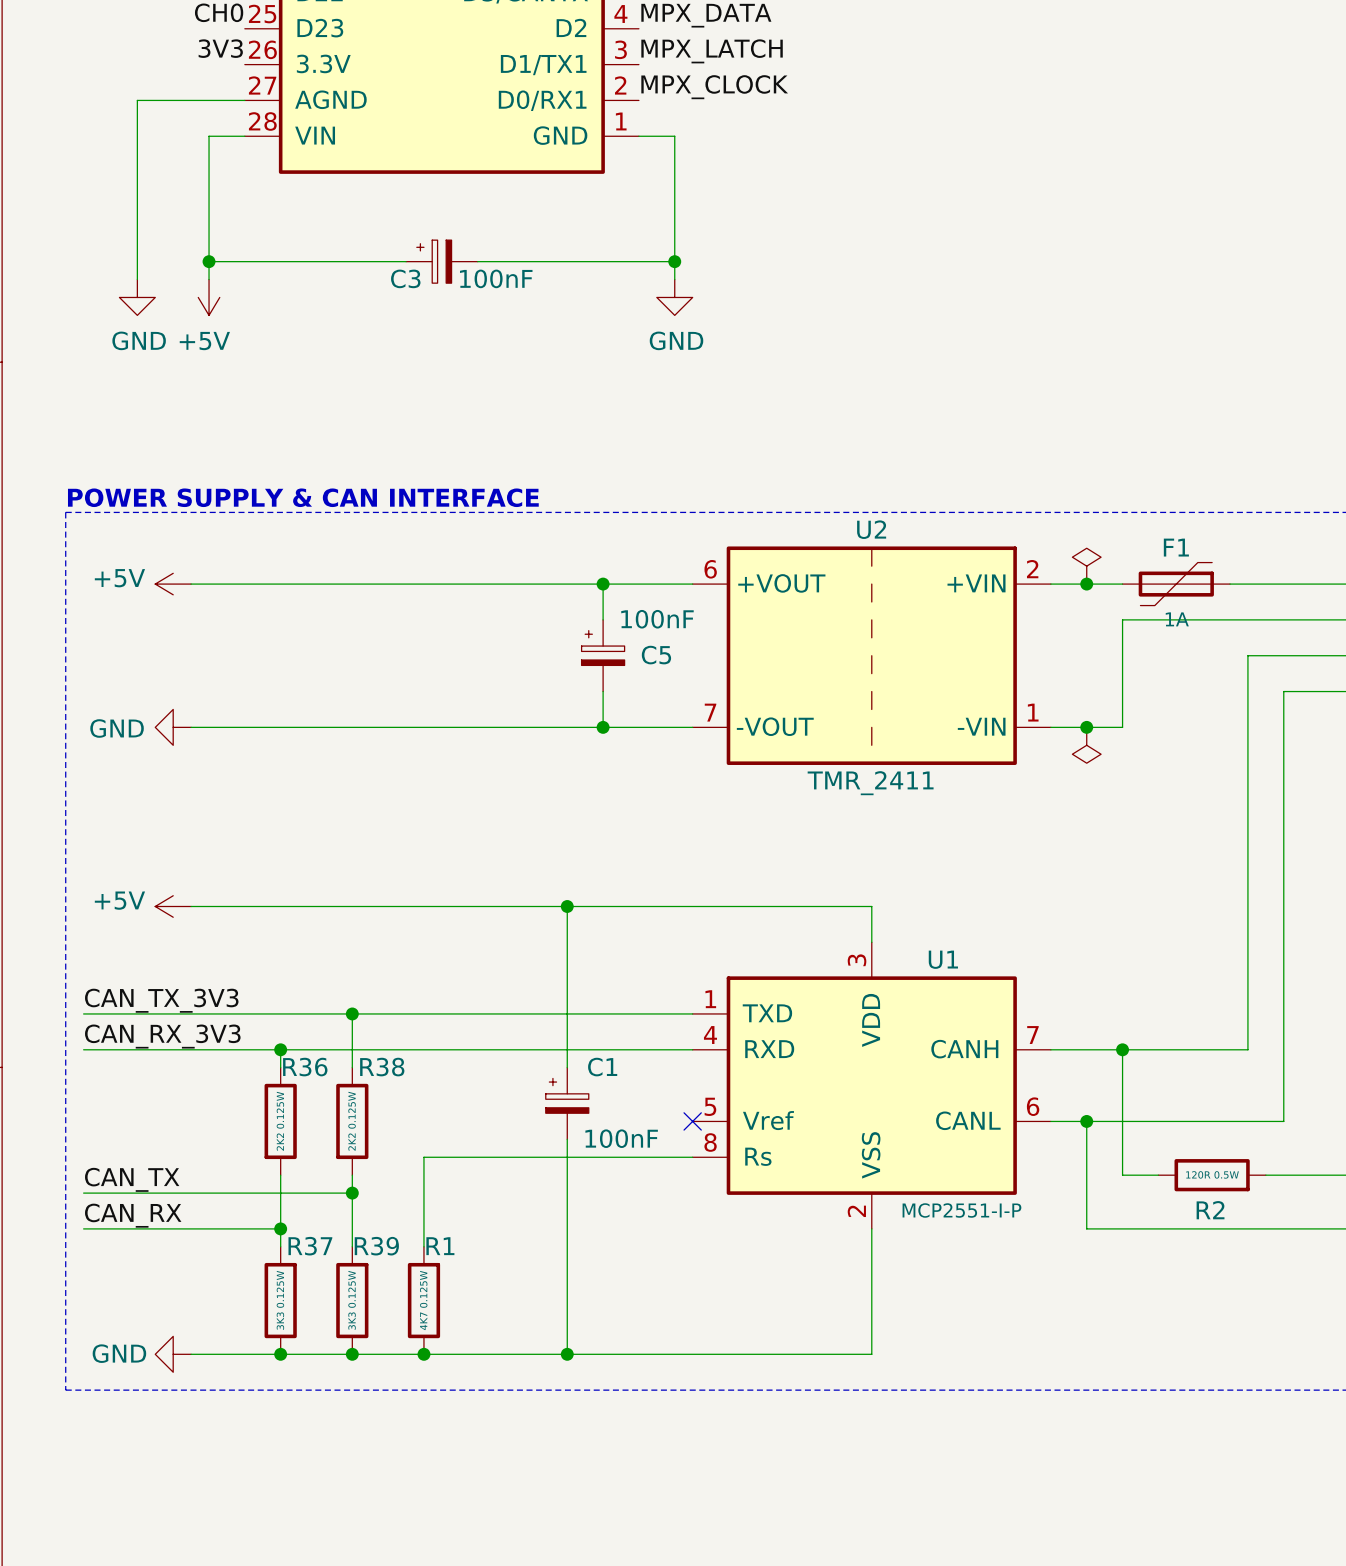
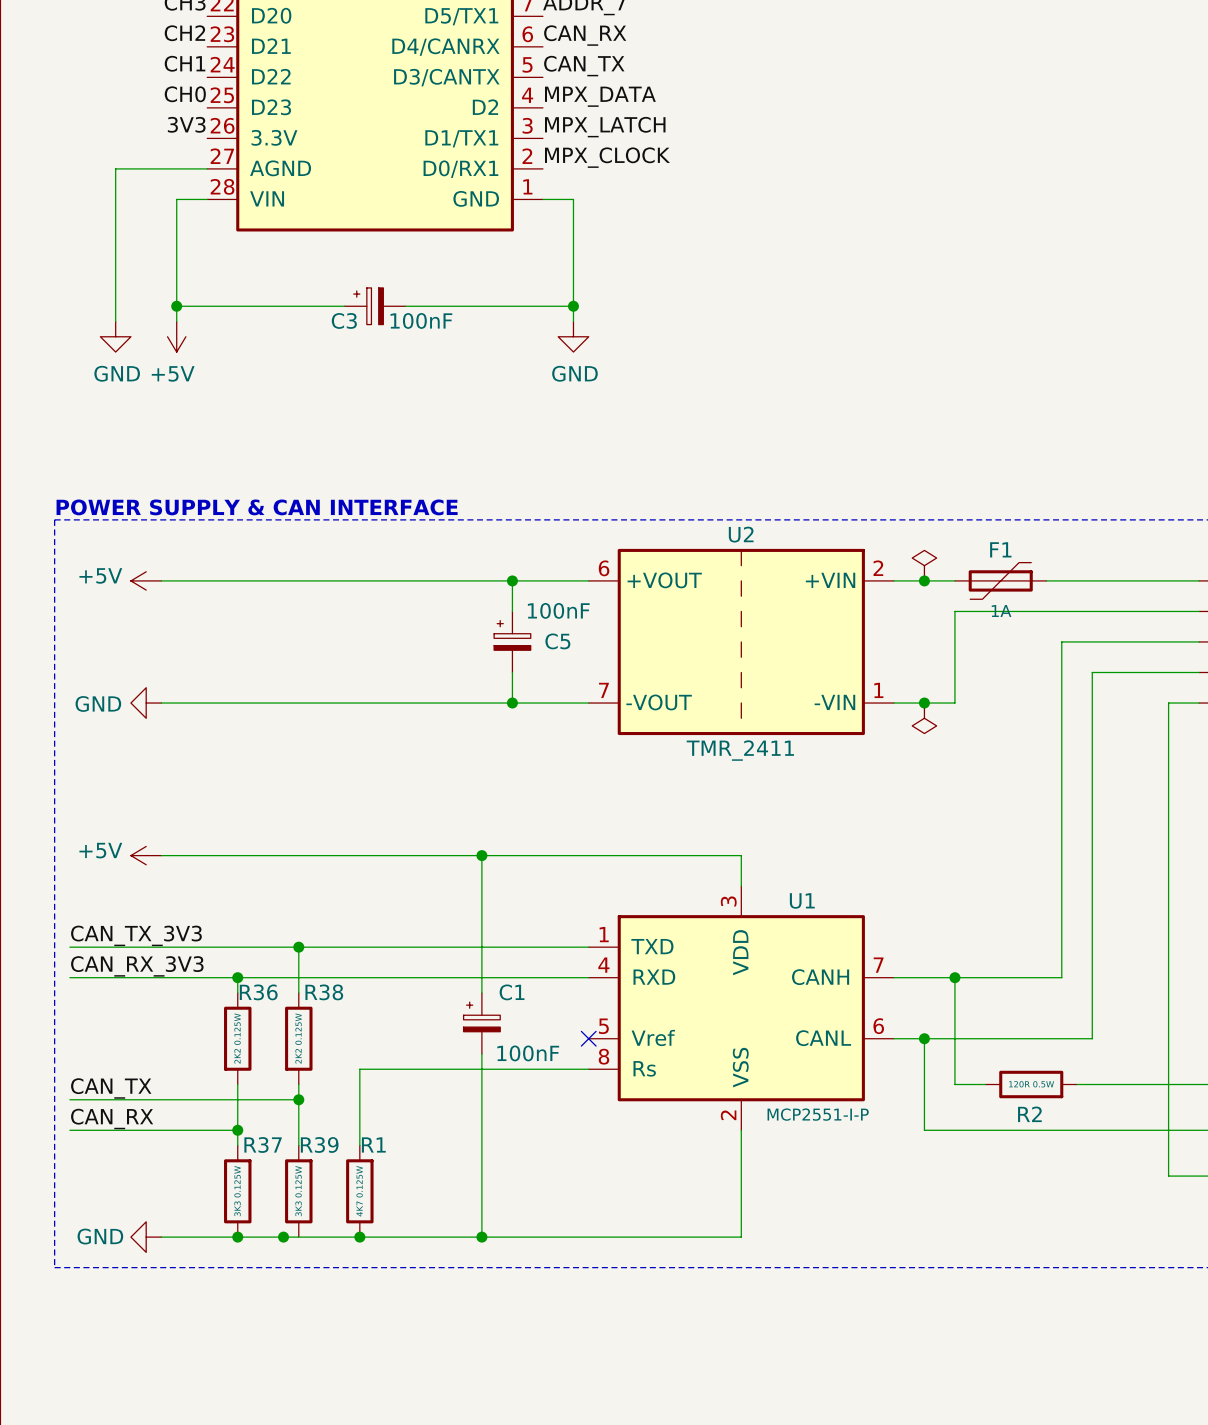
junction position: (352, 1354) -> (283, 1237)

